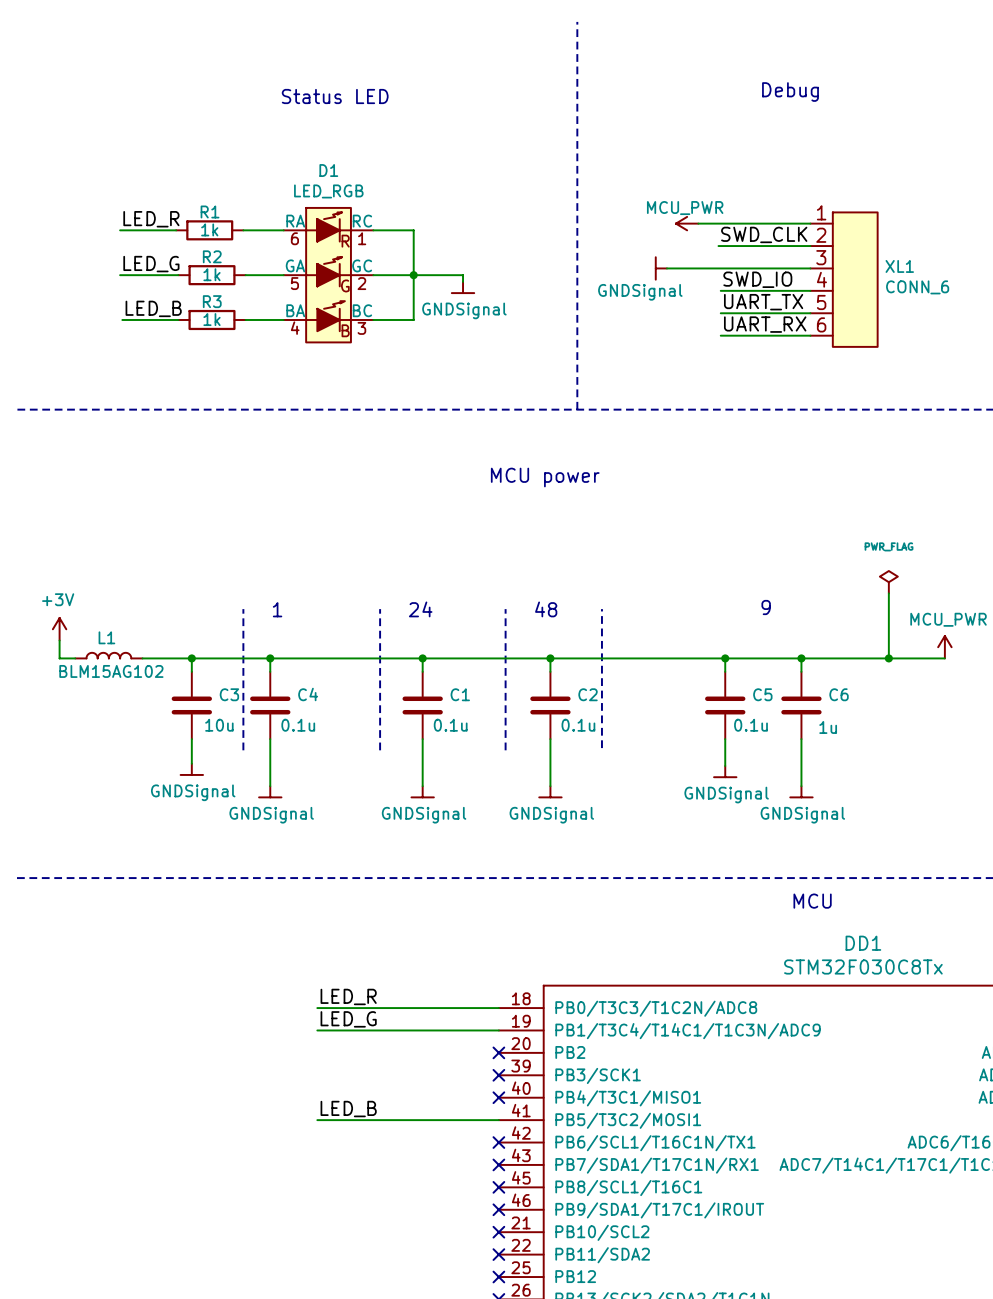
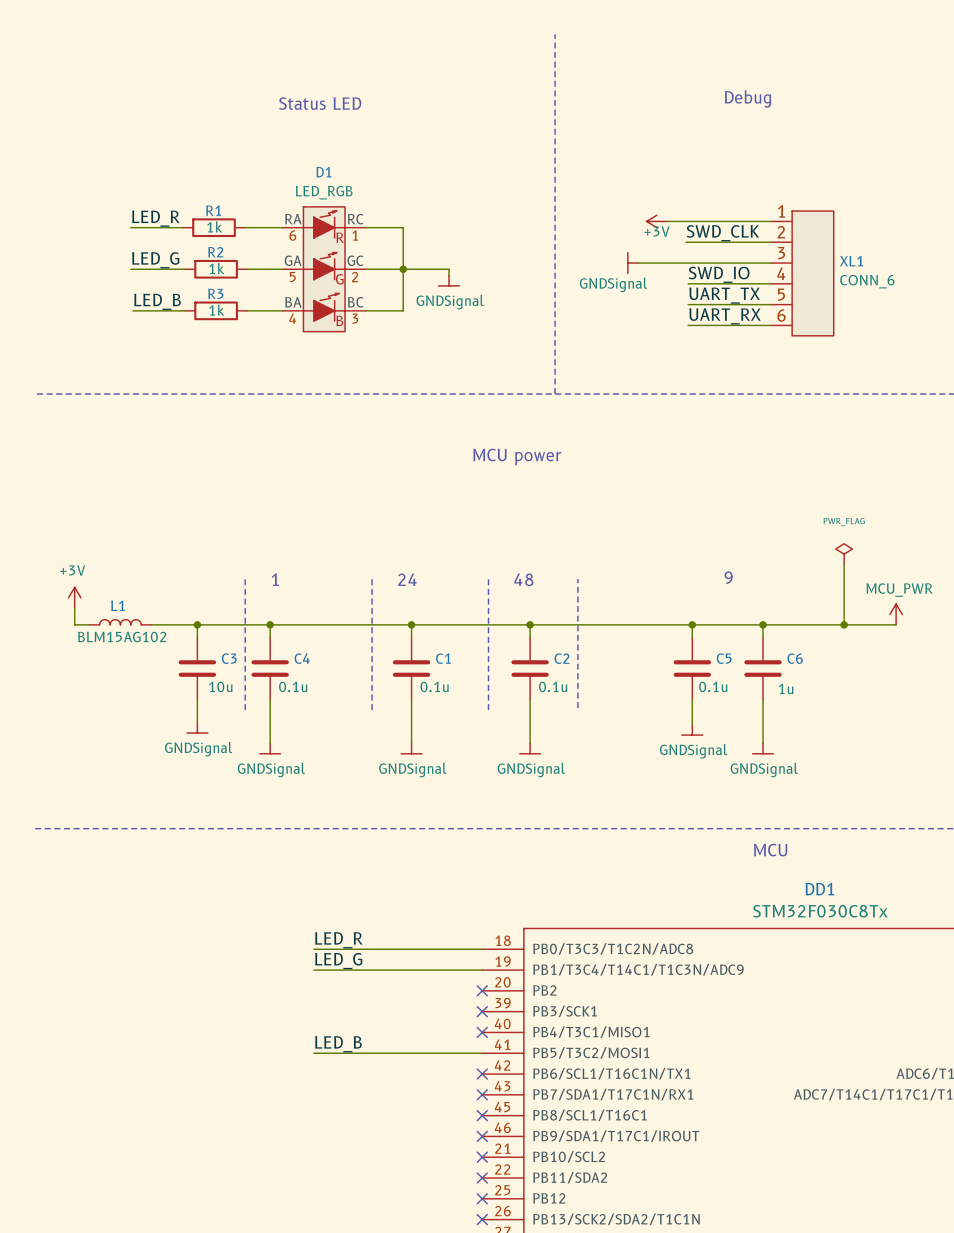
power symbol: MCU_PWR (687, 223) -> +3V (656, 221)

